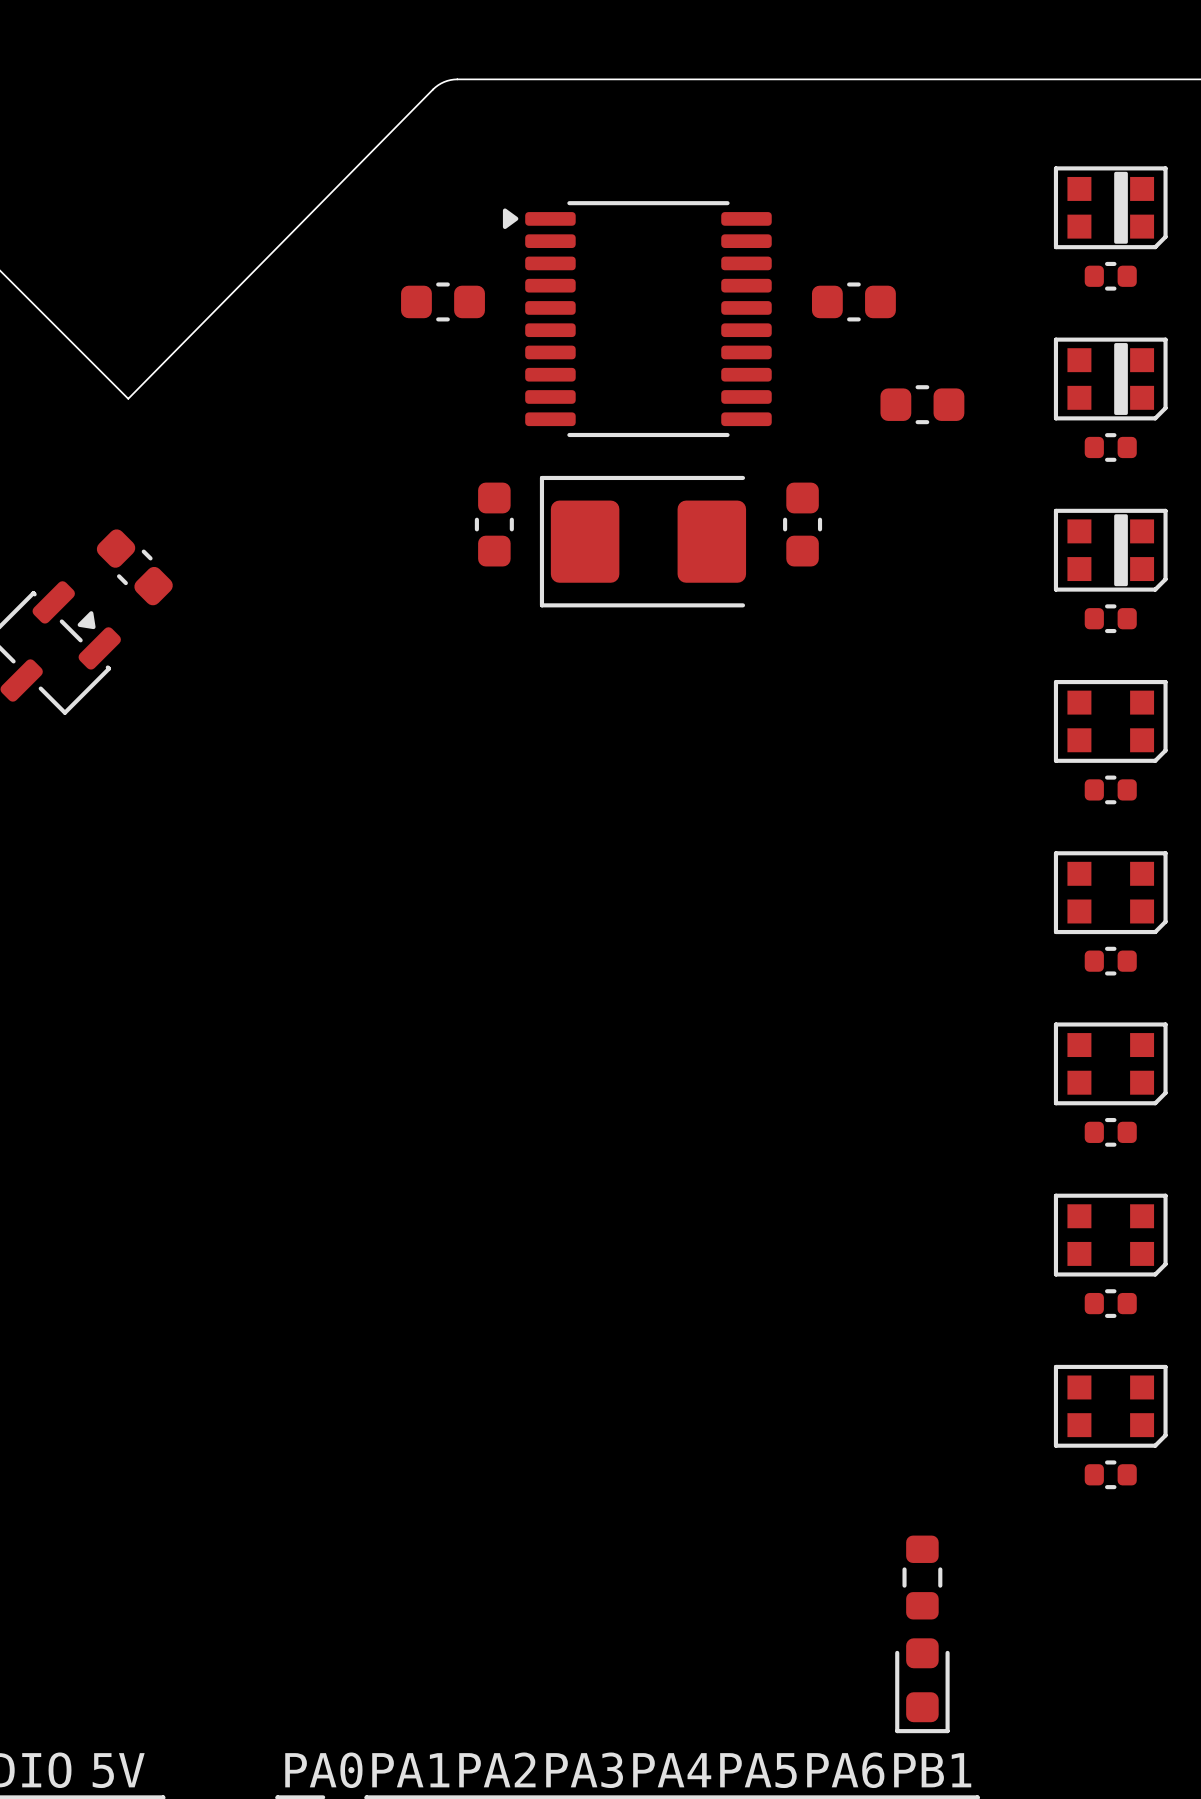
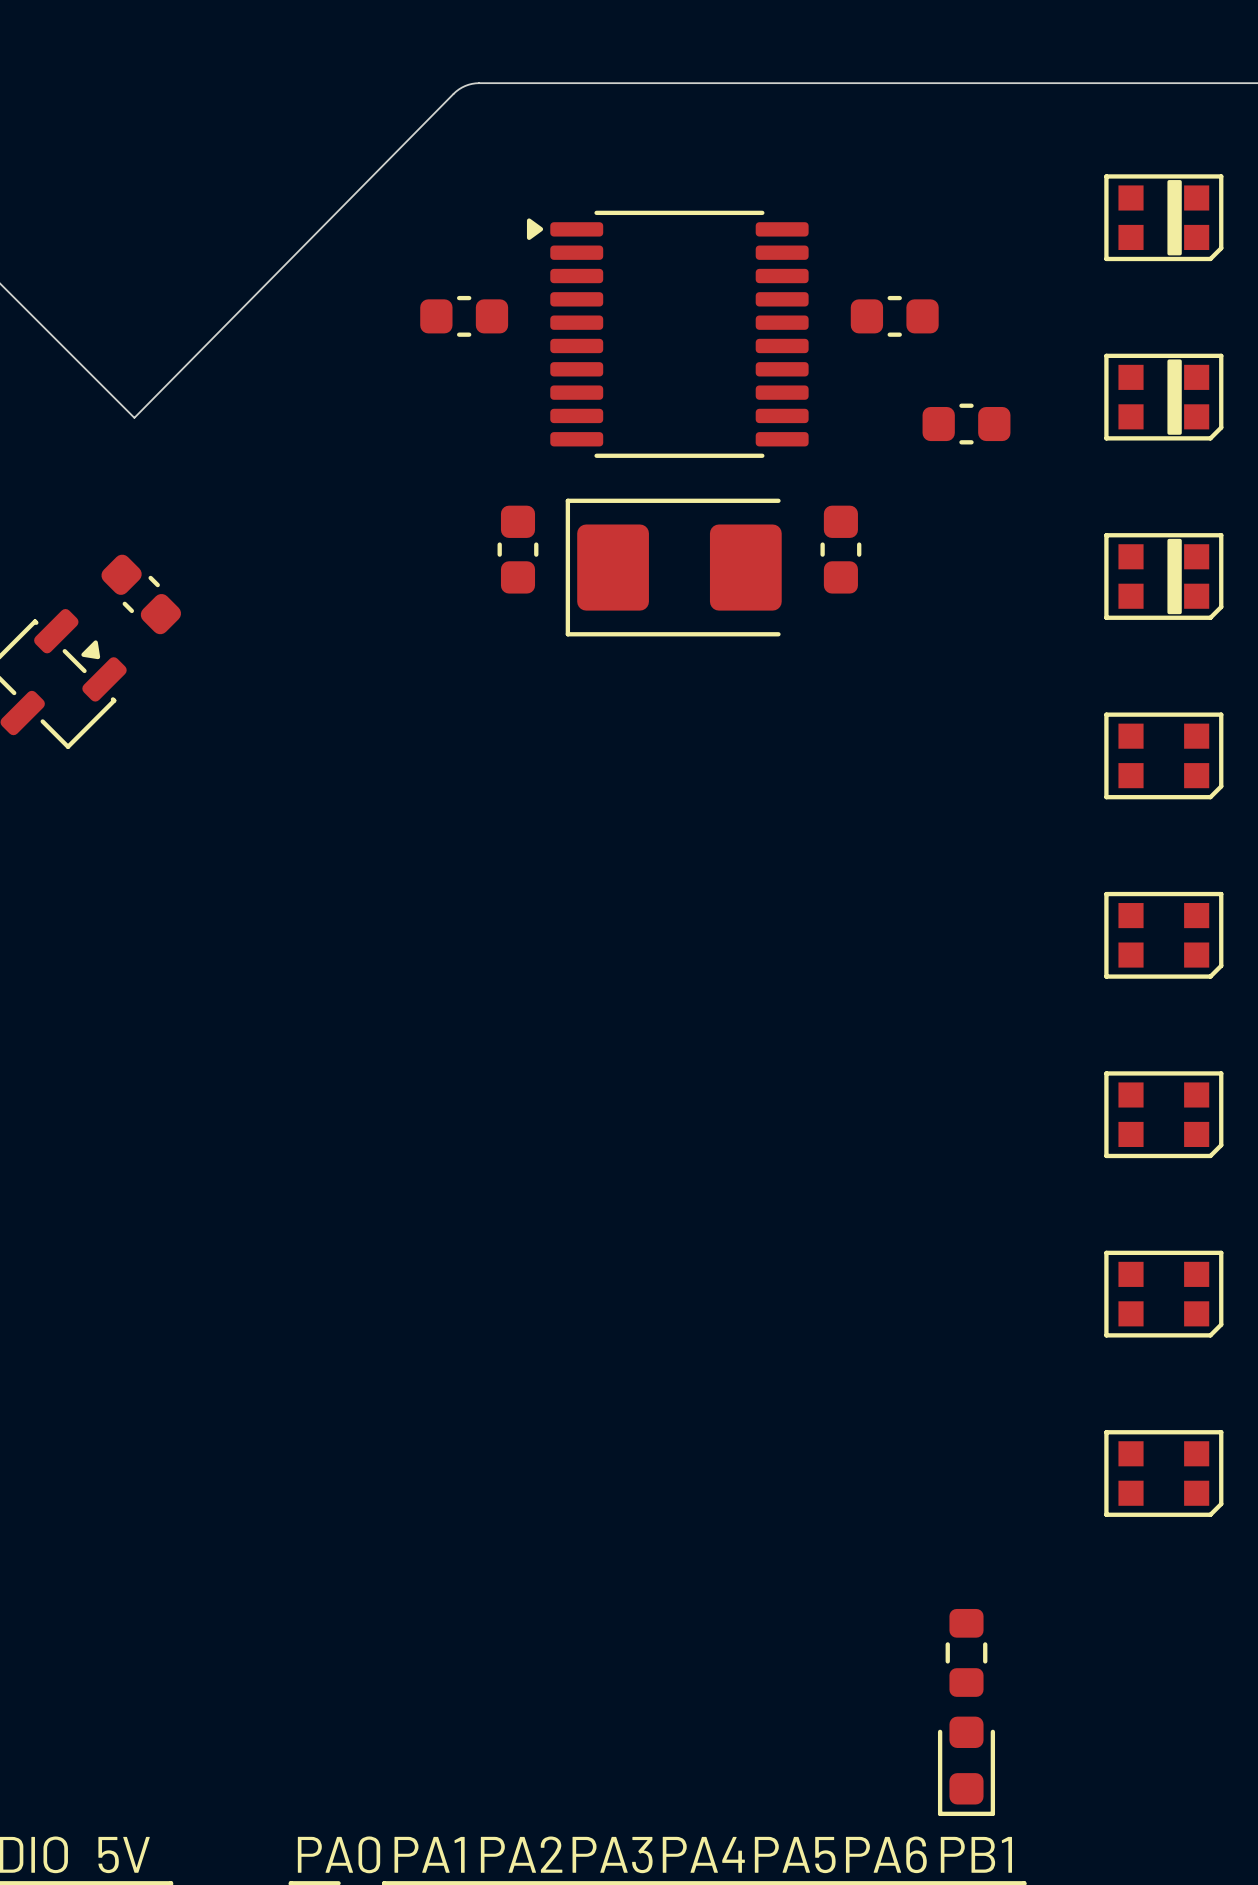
part: (1110, 276) -> none
part: (1110, 447) -> none
part: (1110, 618) -> none
part: (1110, 789) -> none
part: (1110, 961) -> none
part: (1110, 1132) -> none
part: (1110, 1303) -> none
part: (1110, 1474) -> none

